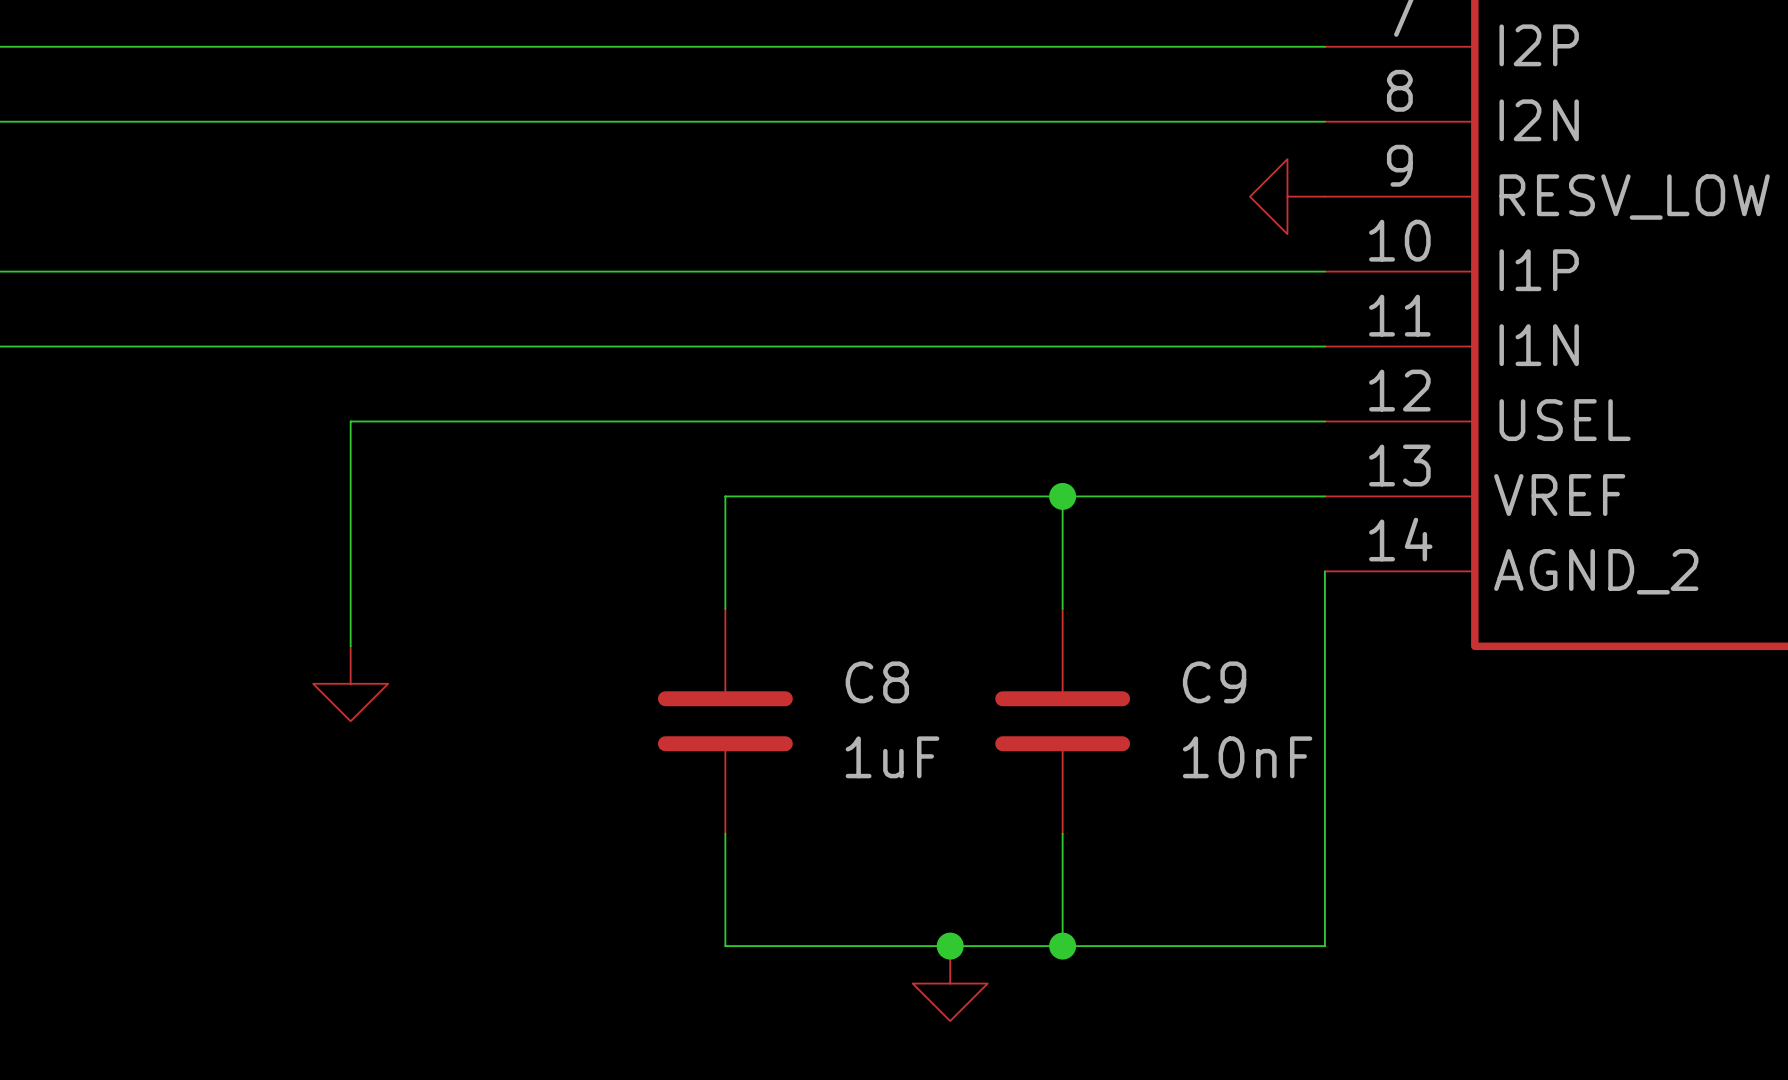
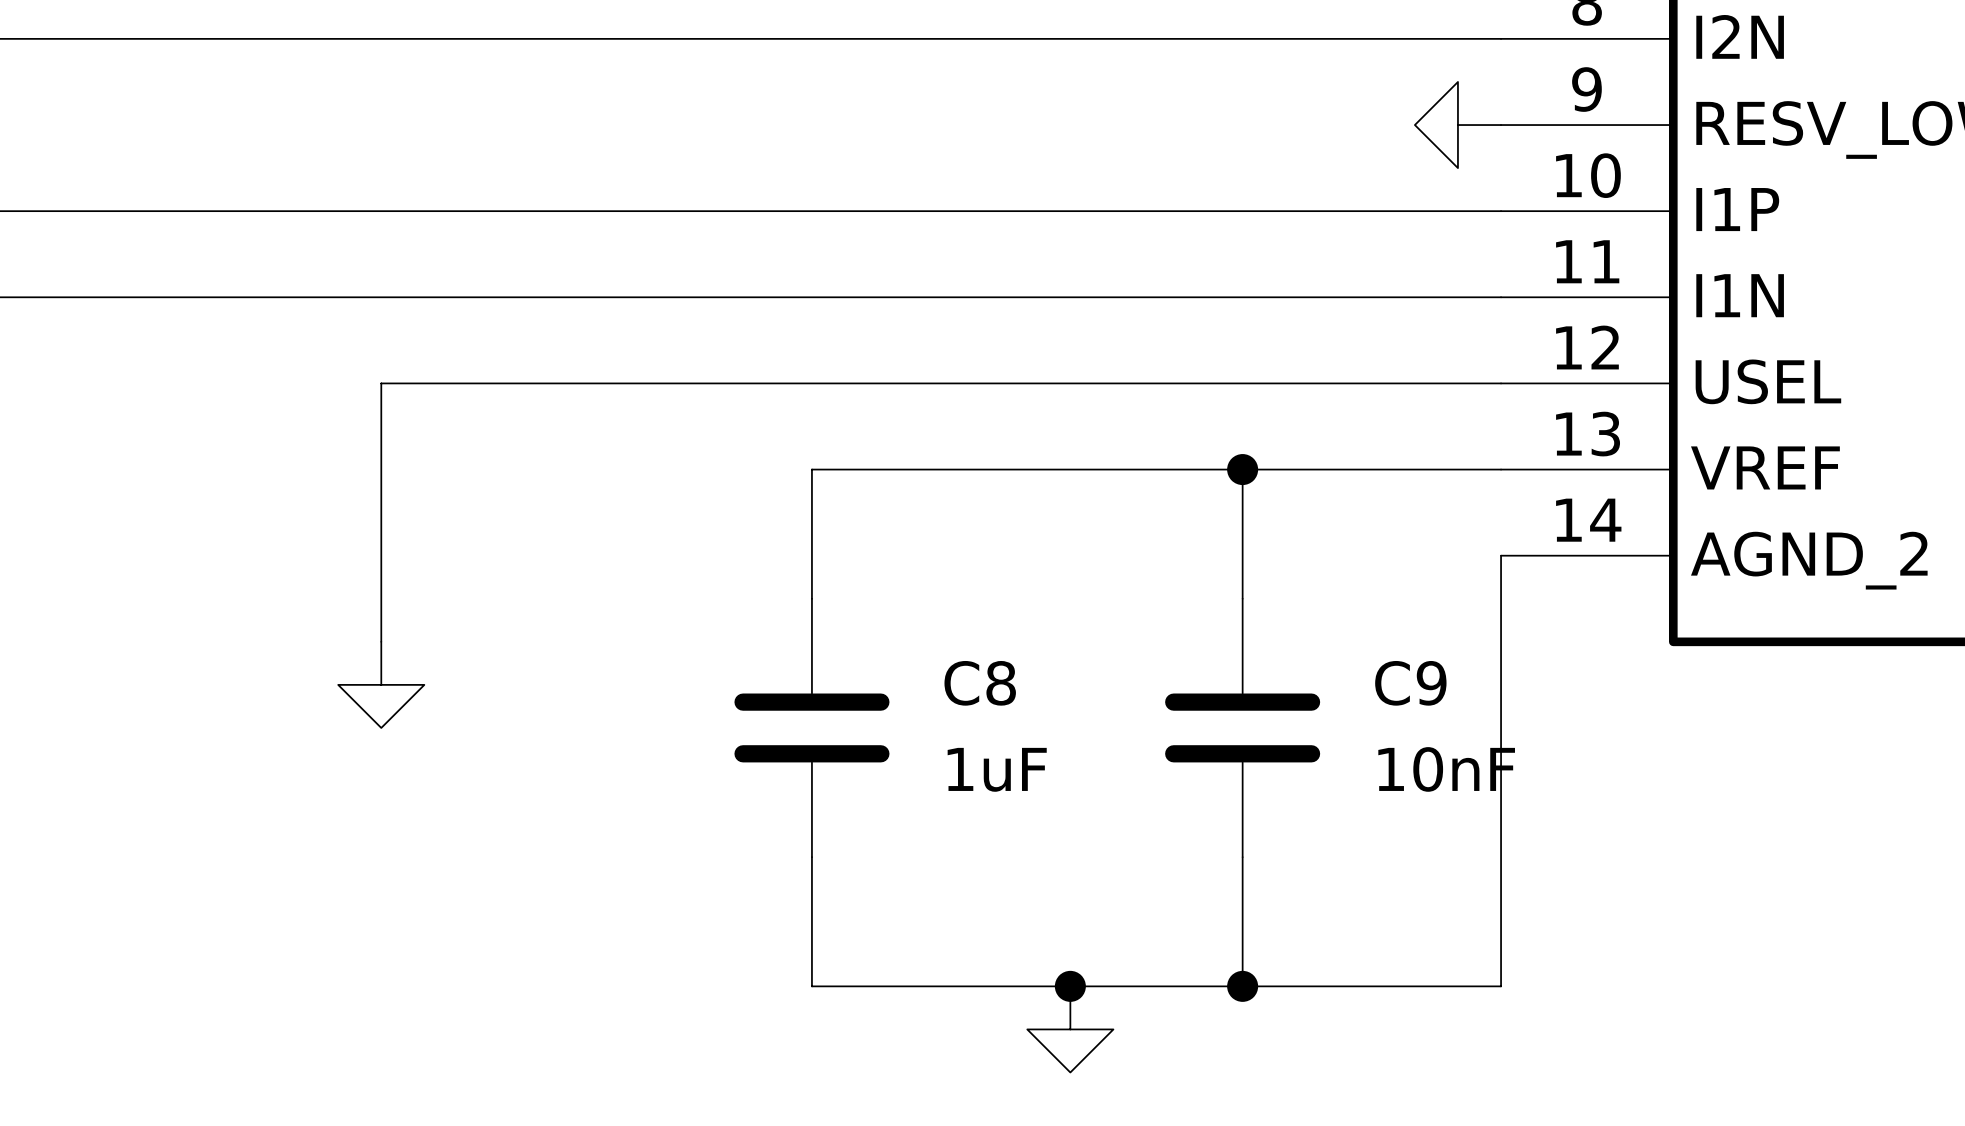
wire: (1062, 496) (1062, 608) -> (1242, 469) (1242, 598)
junction position: (1062, 496) -> (1242, 469)
C9 position: (1062, 721) -> (1242, 727)
wire: (1062, 833) (1062, 946) -> (1242, 857) (1242, 986)
junction position: (1062, 946) -> (1242, 986)

